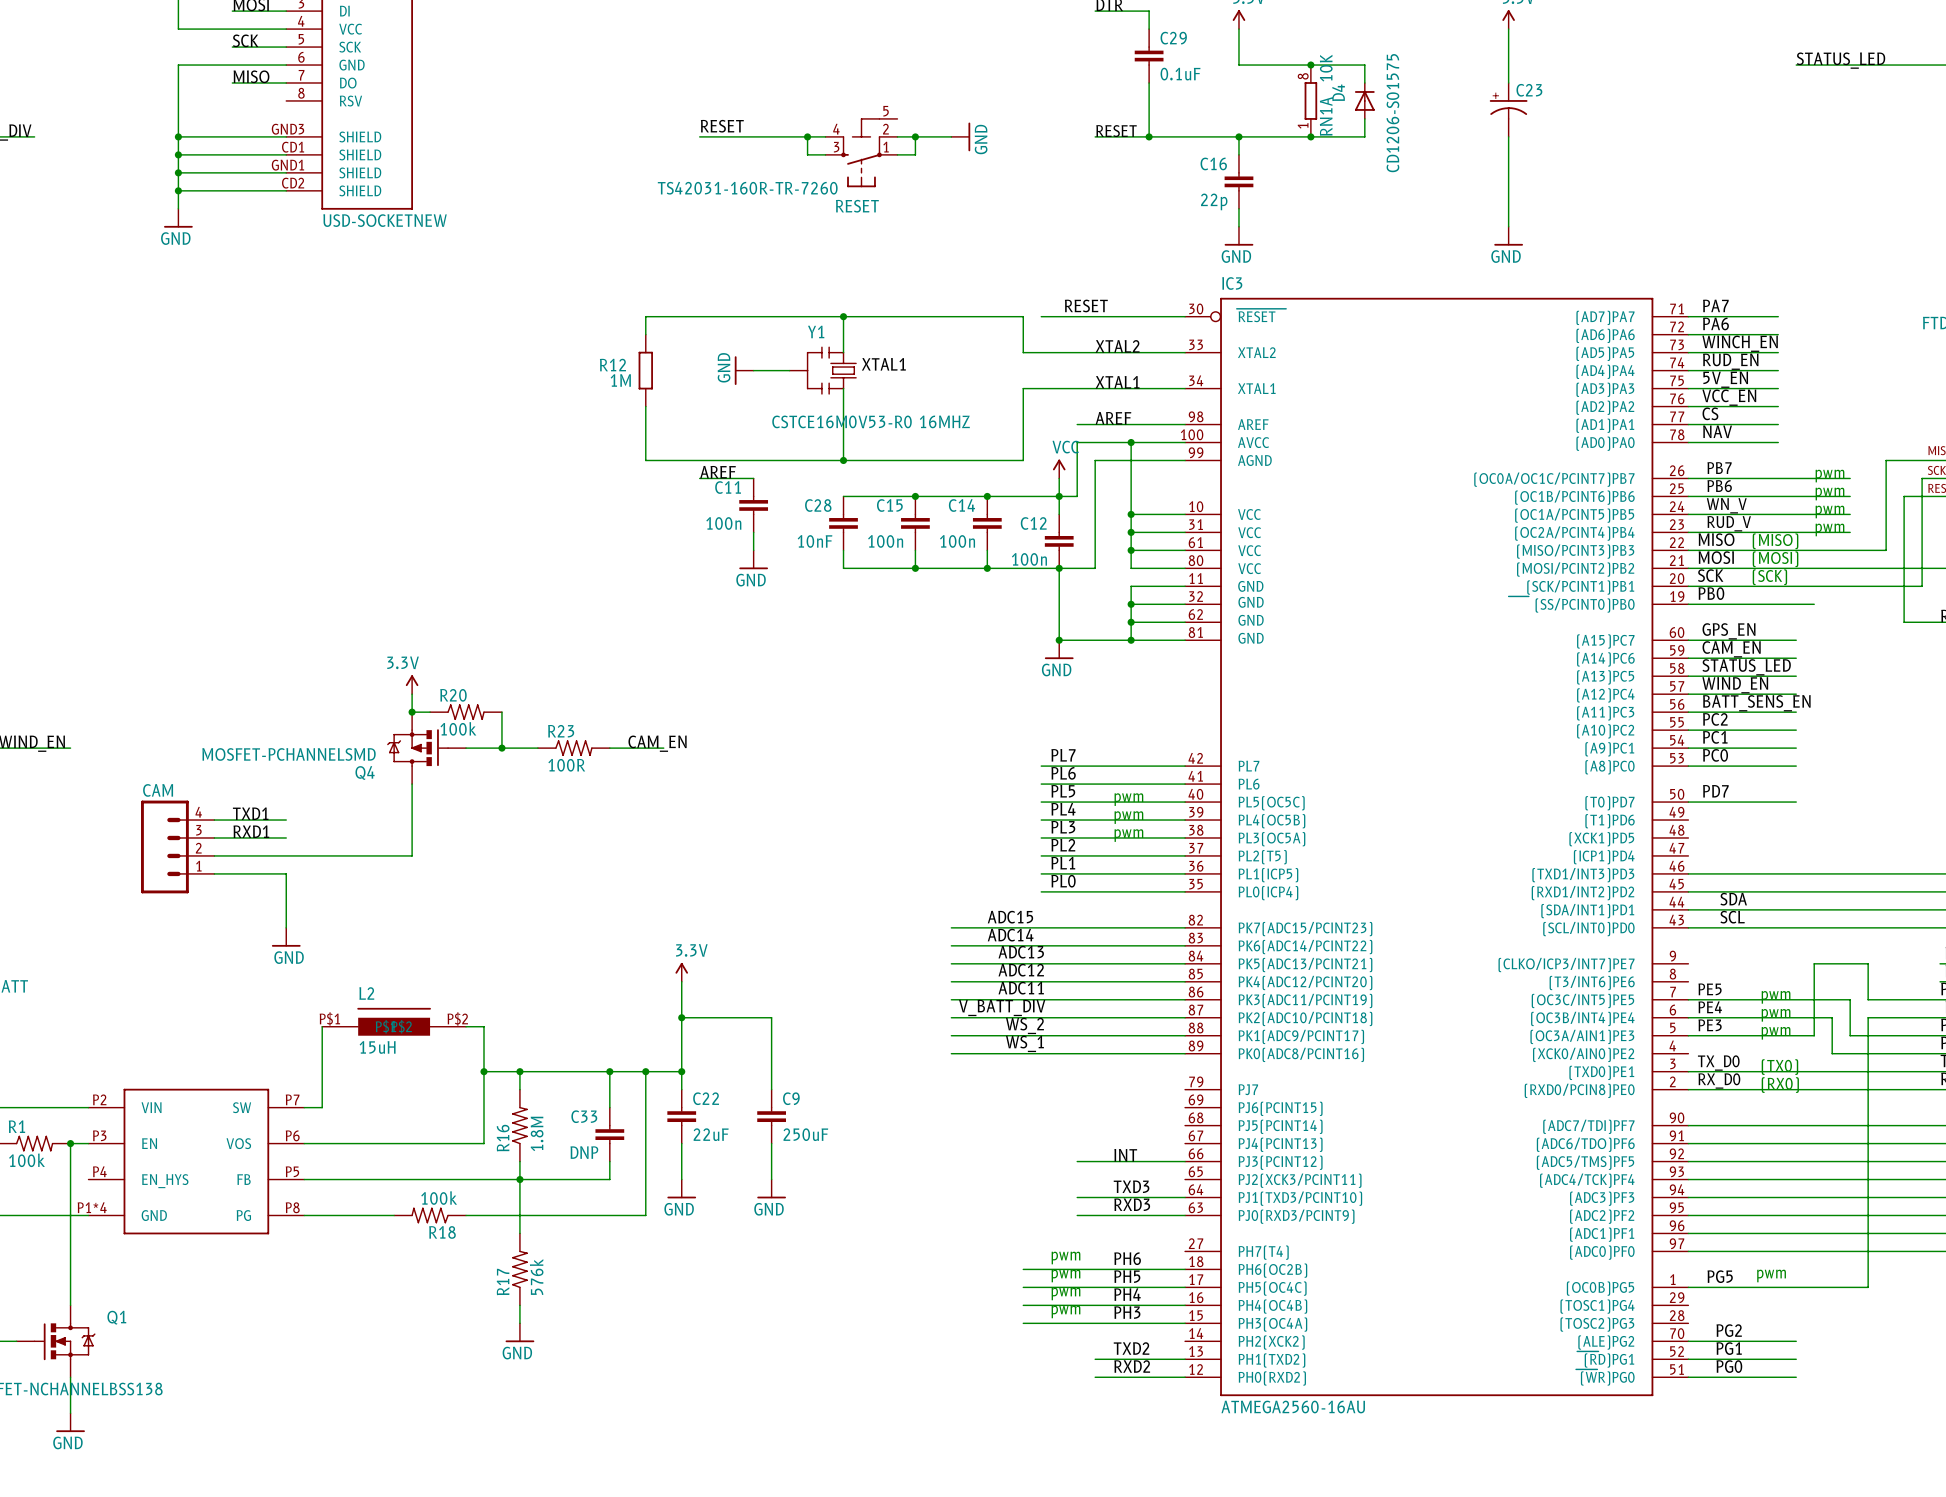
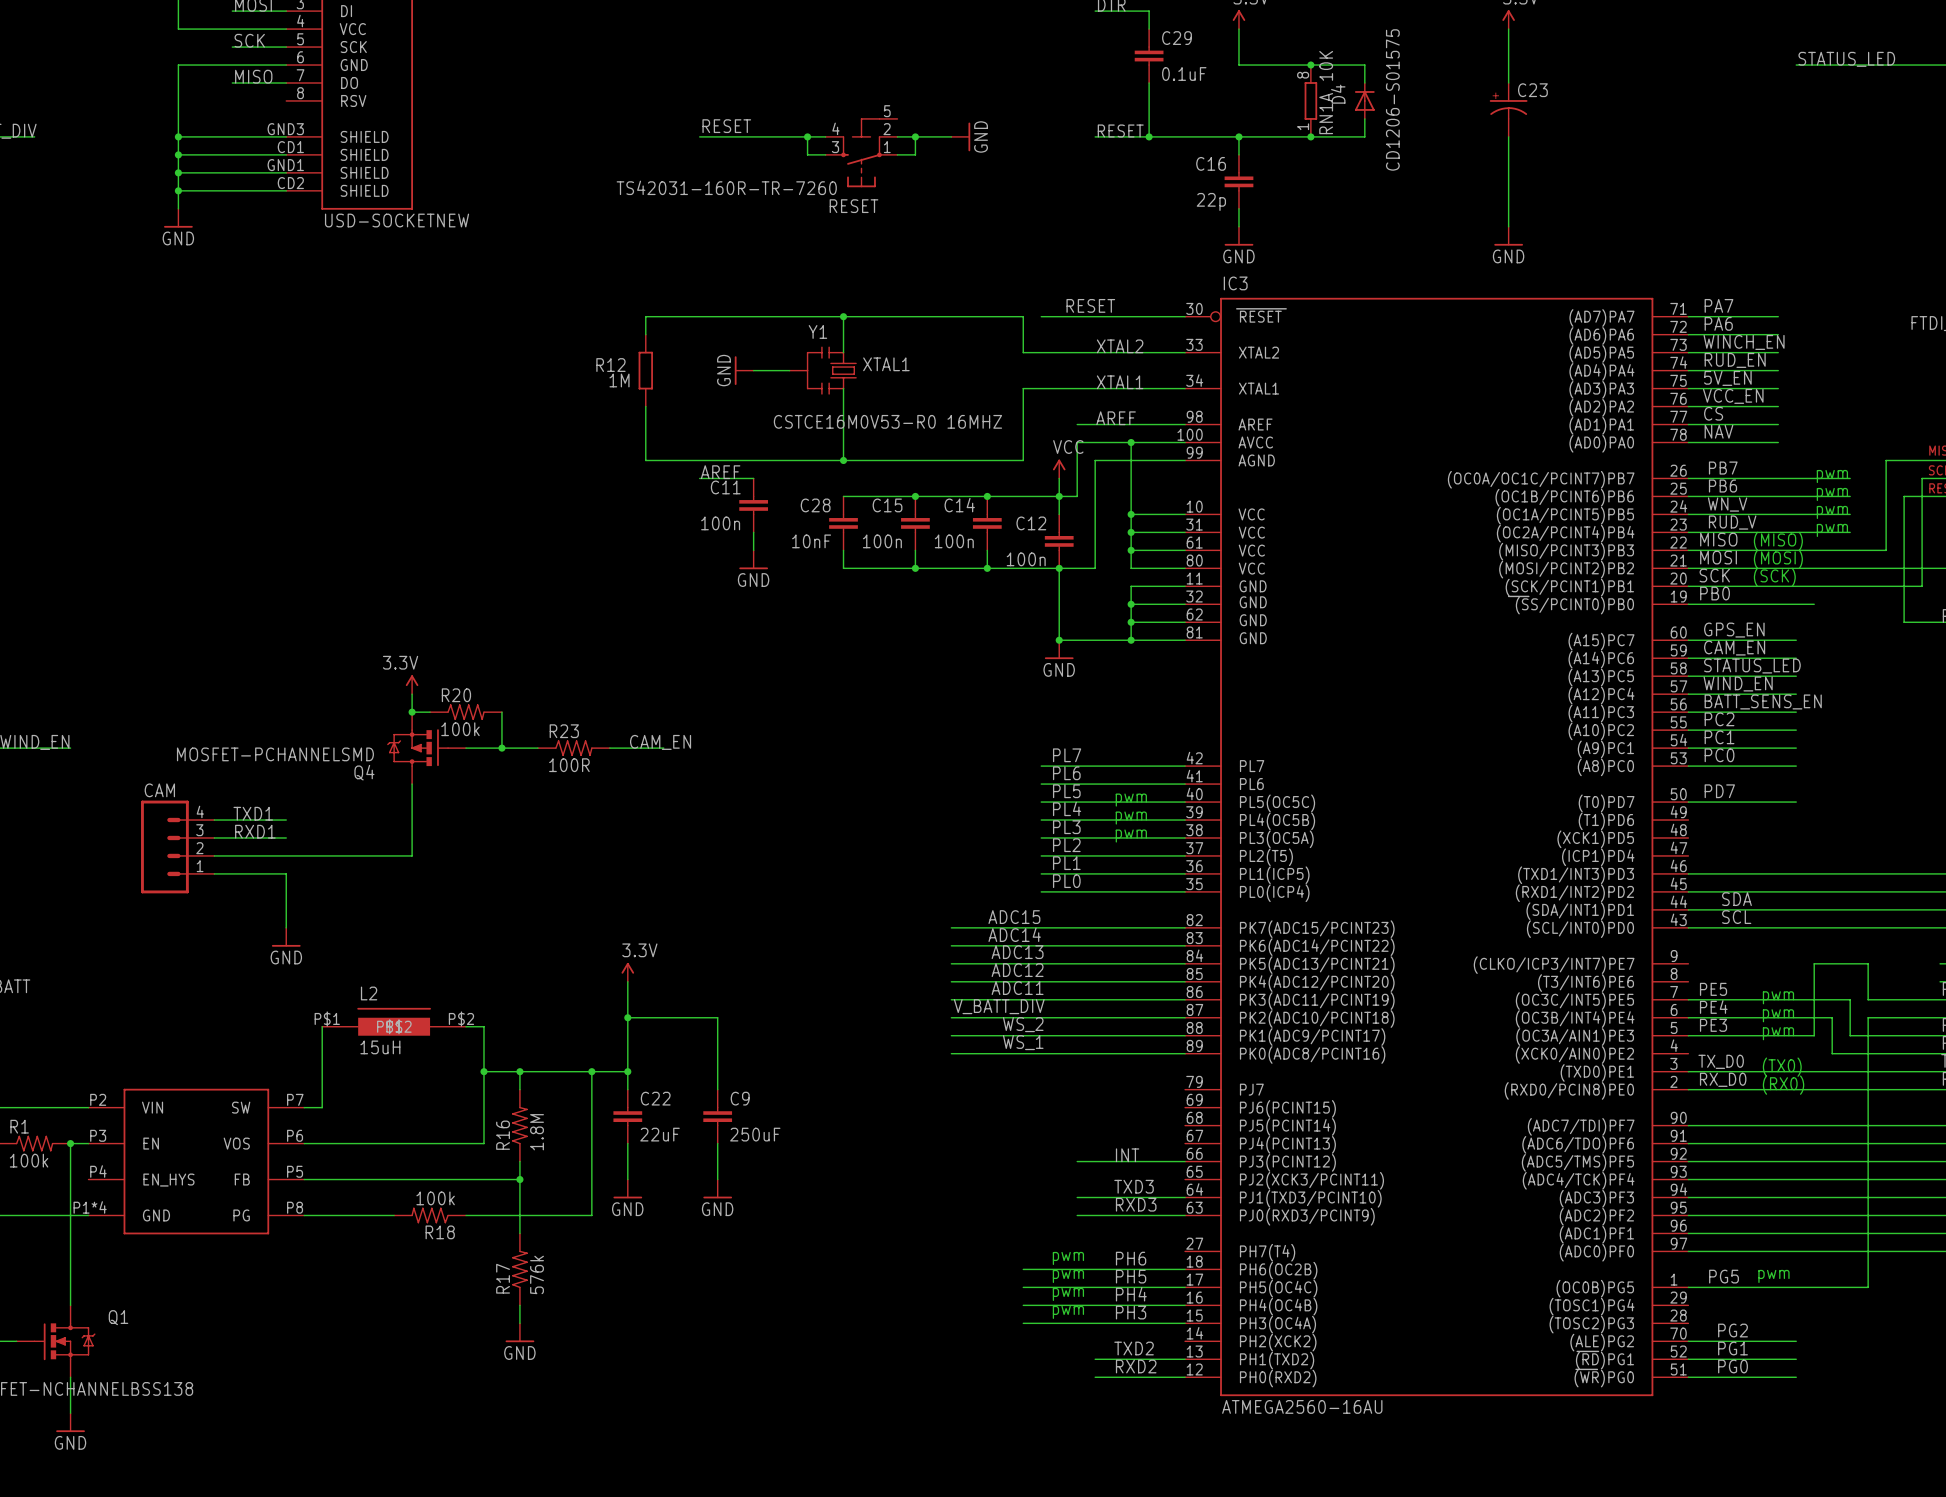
power symbol position: 3.3V (681, 972) -> 3.3V (627, 972)
wire: (681, 981) (681, 1089) -> (627, 981) (627, 1089)
junction: none -> (627, 1017)
junction: (681, 1017) -> none
wire: (717, 1017) (771, 1017) (771, 1089) -> (717, 1017) (717, 1089)
junction: none -> (591, 1071)
wire: (609, 1071) (609, 1107) -> none
junction: (609, 1071) -> none
wire: (627, 1071) (681, 1071) -> (627, 1017) (681, 1017)
junction: none -> (627, 1071)
wire: (645, 1071) (645, 1215) (591, 1215) -> (591, 1071) (591, 1215)
junction: (645, 1071) -> none
junction: (681, 1071) -> none
C22 position: (681, 1116) -> (627, 1116)
C9 position: (771, 1116) -> (717, 1116)
C33: DNP (609, 1134) -> none
wire: (681, 1143) (681, 1179) -> (627, 1143) (627, 1179)
wire: (771, 1143) (771, 1179) -> (717, 1143) (717, 1179)
wire: (609, 1161) (609, 1179) (519, 1179) -> none
power symbol: none -> GND (627, 1188)
power symbol: GND (681, 1188) -> none
power symbol: none -> GND (717, 1188)
power symbol: GND (771, 1188) -> none

